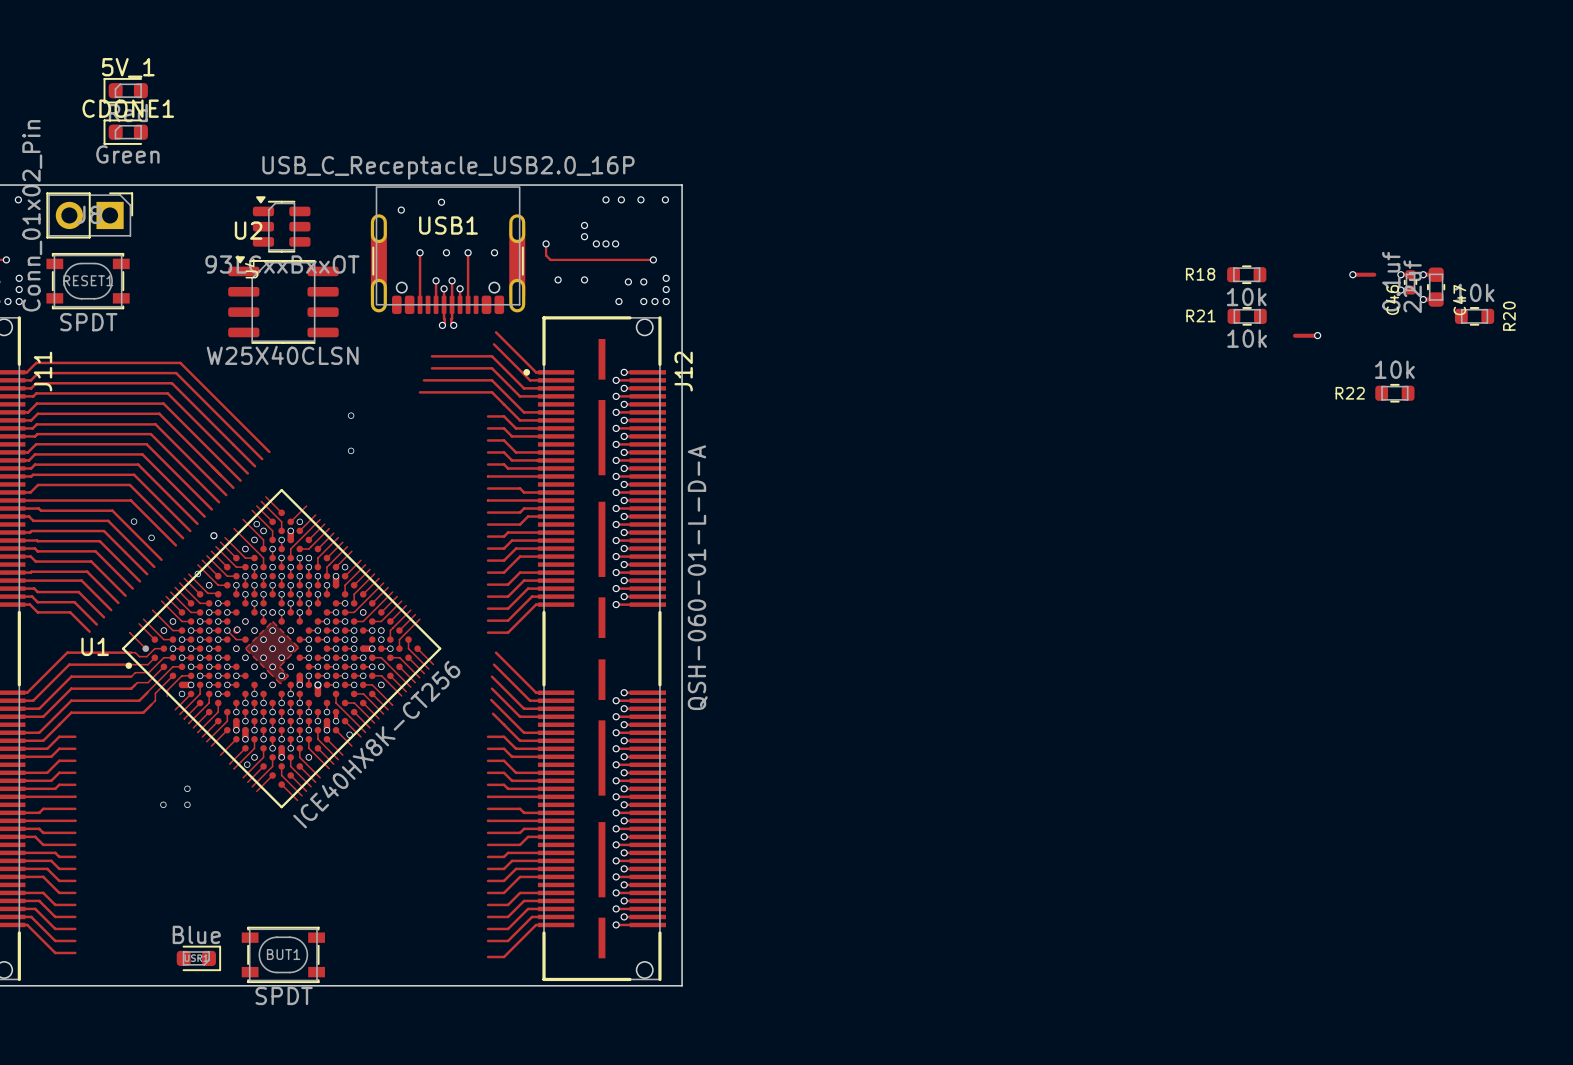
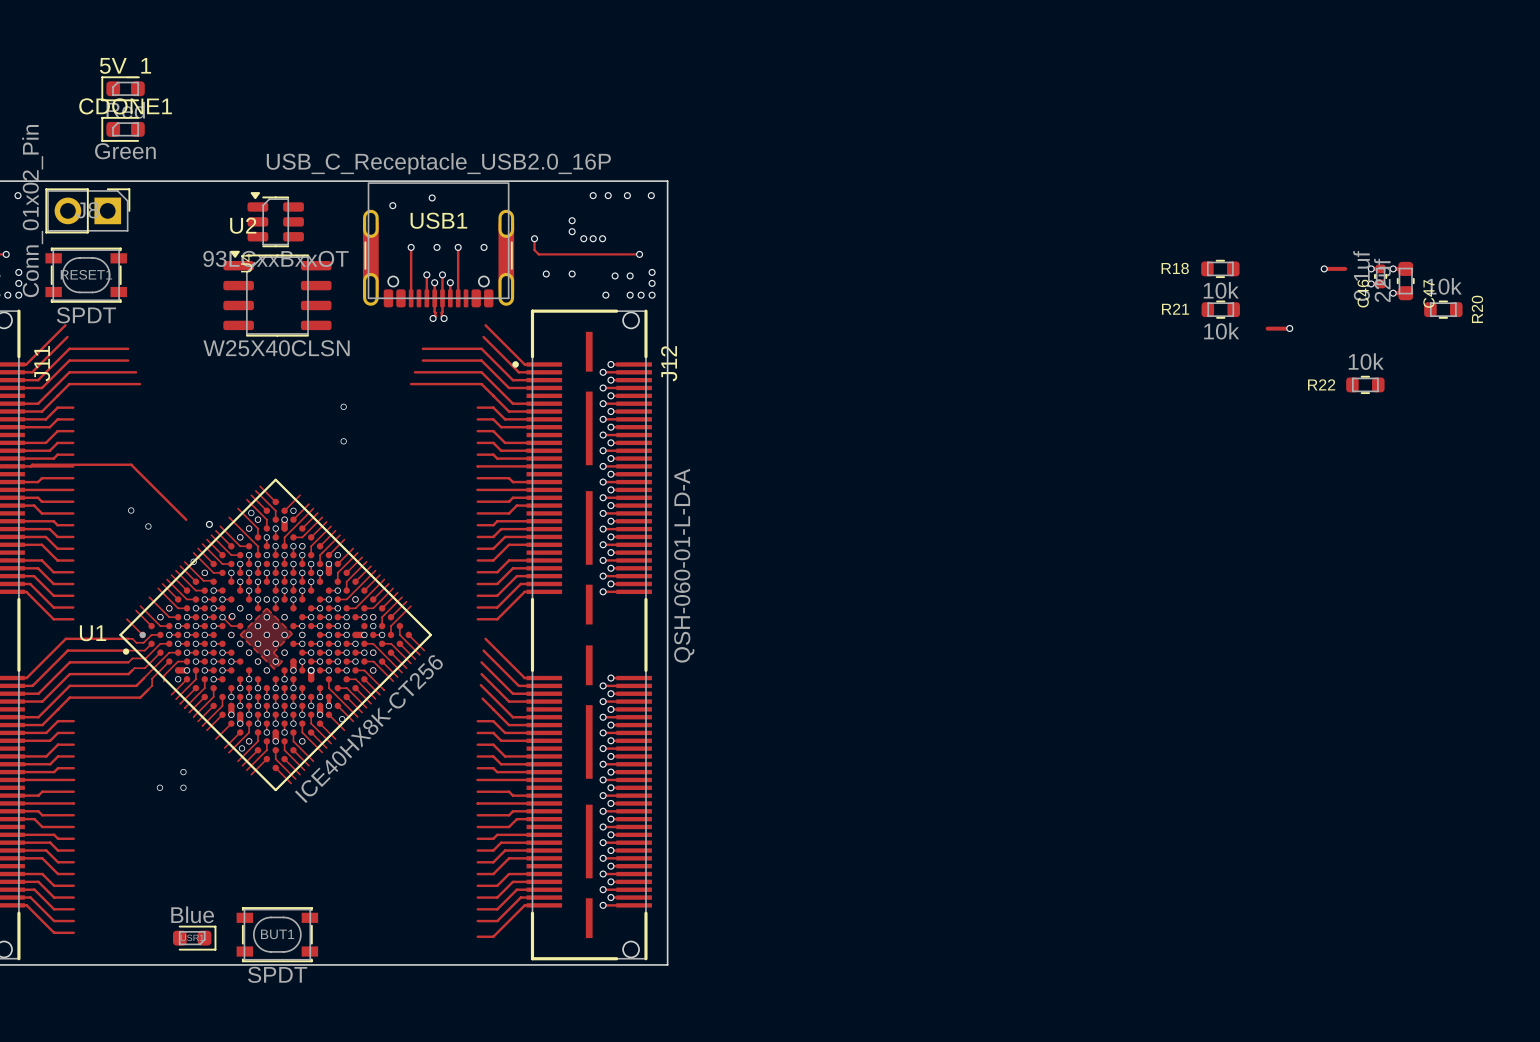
track: (36, 362) (180, 362) (269, 451) -> (35, 355) (65, 325)
track: (30, 380) (38, 373) (176, 373) (262, 459) -> (30, 372) (67, 337)
track: (31, 388) (36, 383) (171, 383) (255, 466) -> (30, 380) (38, 380) (69, 348) (128, 348)
track: (33, 396) (36, 393) (167, 393) (247, 473) -> (32, 388) (42, 388) (69, 360) (128, 360)
track: (28, 412) (36, 403) (163, 403) (240, 480) -> (27, 403) (38, 403) (69, 372) (136, 372)
track: (31, 420) (37, 413) (159, 413) (233, 487) -> (30, 411) (42, 411) (69, 384) (139, 384)
track: (32, 428) (36, 424) (155, 424) (226, 495) -> (32, 419) (45, 419) (57, 407) (73, 407)
track: (35, 436) (37, 434) (150, 434) (219, 502) -> (34, 427) (49, 427) (57, 419) (73, 419)
track: (27, 452) (36, 444) (146, 444) (211, 509) -> (27, 442) (45, 442) (57, 431) (73, 431)
track: (28, 460) (35, 454) (142, 454) (204, 516) -> (28, 450) (49, 450) (57, 442) (73, 442)
track: (31, 468) (35, 464) (138, 464) (197, 523) -> (30, 458) (53, 458) (57, 454) (73, 454)
track: (30, 492) (38, 484) (129, 484) (183, 538) -> (29, 482) (38, 482) (41, 478) (73, 478)
track: (74, 500) (131, 500) (175, 545) -> none
track: (41, 510) (112, 510) (161, 559) -> (40, 499) (41, 501) (73, 501)
track: (29, 516) (33, 520) (108, 520) (154, 566) -> (28, 505) (34, 505) (41, 513) (73, 513)
track: (30, 532) (104, 531) (147, 574) -> (29, 521) (53, 521) (57, 525) (73, 525)
track: (37, 540) (99, 541) (139, 581) -> (36, 529) (49, 529) (57, 536) (73, 536)
track: (34, 548) (37, 551) (95, 551) (132, 588) -> (34, 536) (45, 536) (57, 548) (73, 548)
track: (30, 556) (35, 561) (91, 561) (125, 595) -> (30, 544) (41, 544) (57, 560) (73, 560)
track: (30, 572) (87, 571) (118, 602) -> (30, 560) (41, 560) (53, 572) (73, 572)
track: (38, 580) (81, 580) (111, 610) -> (38, 568) (53, 584) (73, 584)
track: (34, 588) (37, 592) (78, 592) (104, 617) -> (33, 576) (53, 595) (73, 595)
track: (30, 596) (37, 602) (74, 602) (96, 624) -> (30, 584) (53, 607) (73, 607)
track: (26, 604) (29, 604) (37, 612) (70, 612) (89, 631) -> (26, 591) (53, 619) (73, 619)

